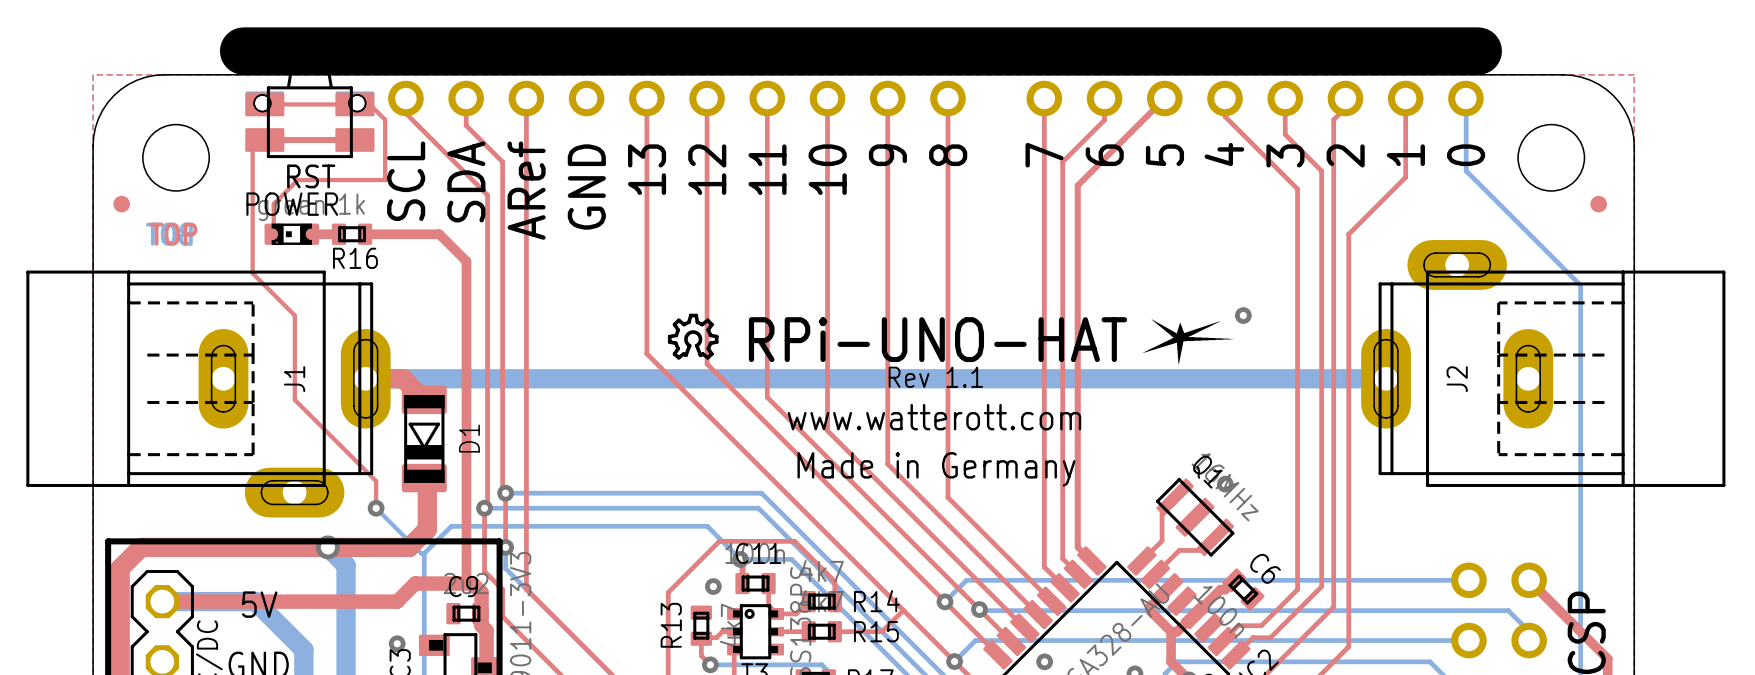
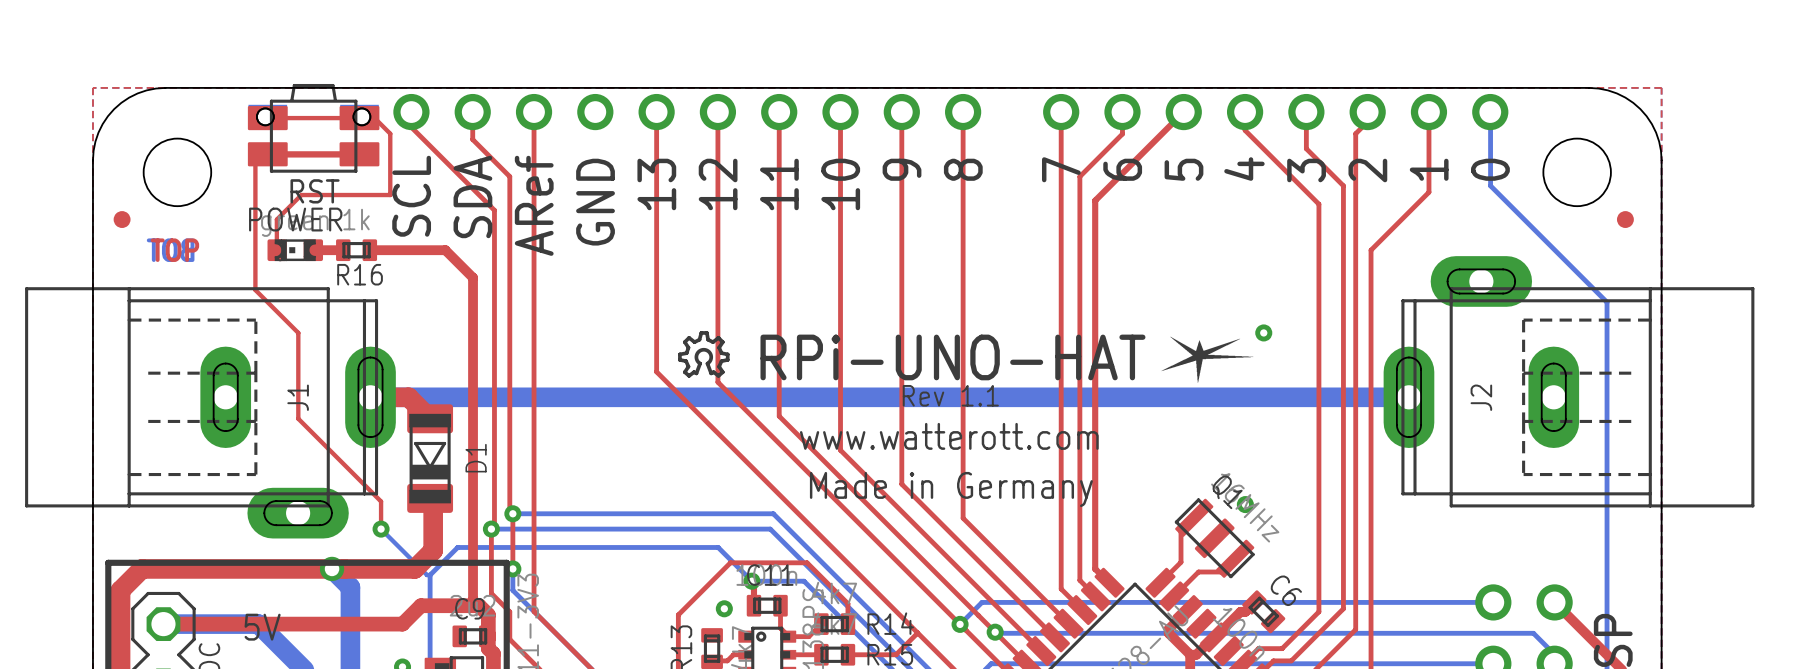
board edge: (243, 51) (1478, 51) -> none

